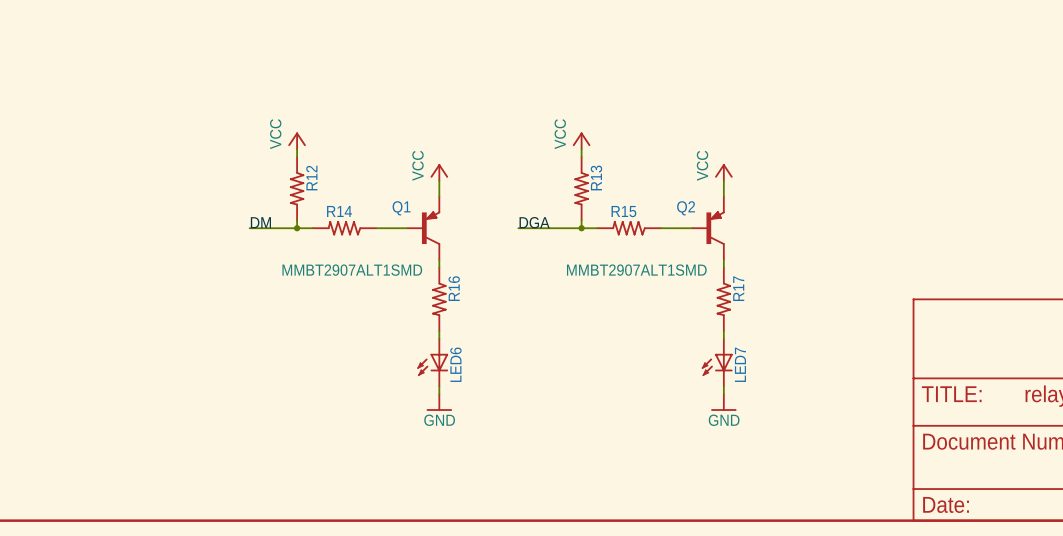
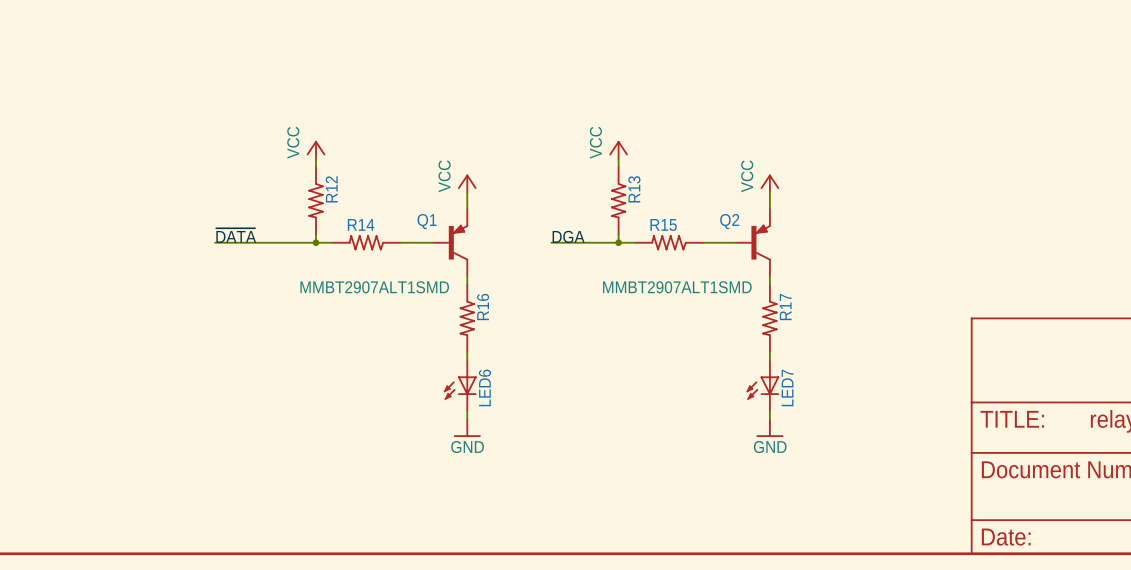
label: none -> ~{DATA} (236, 235)
label: DM (260, 222) -> none
wire: none -> (215, 242) (265, 242)

